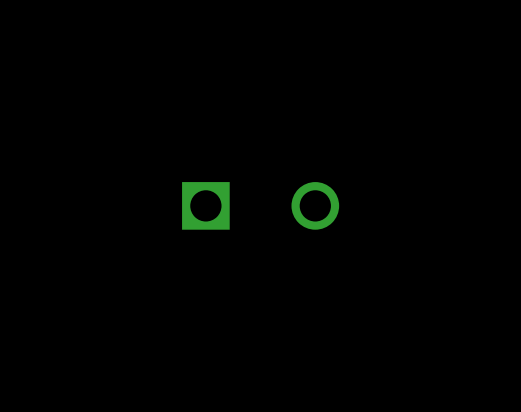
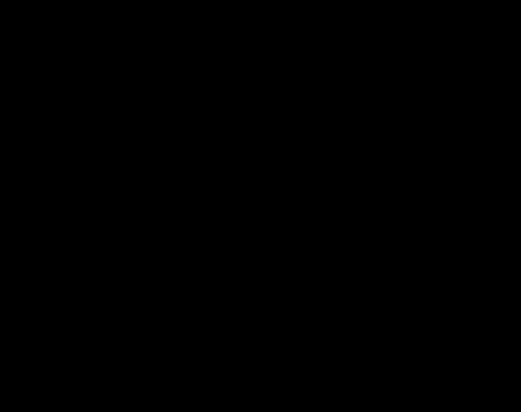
part: (260, 205) -> none

